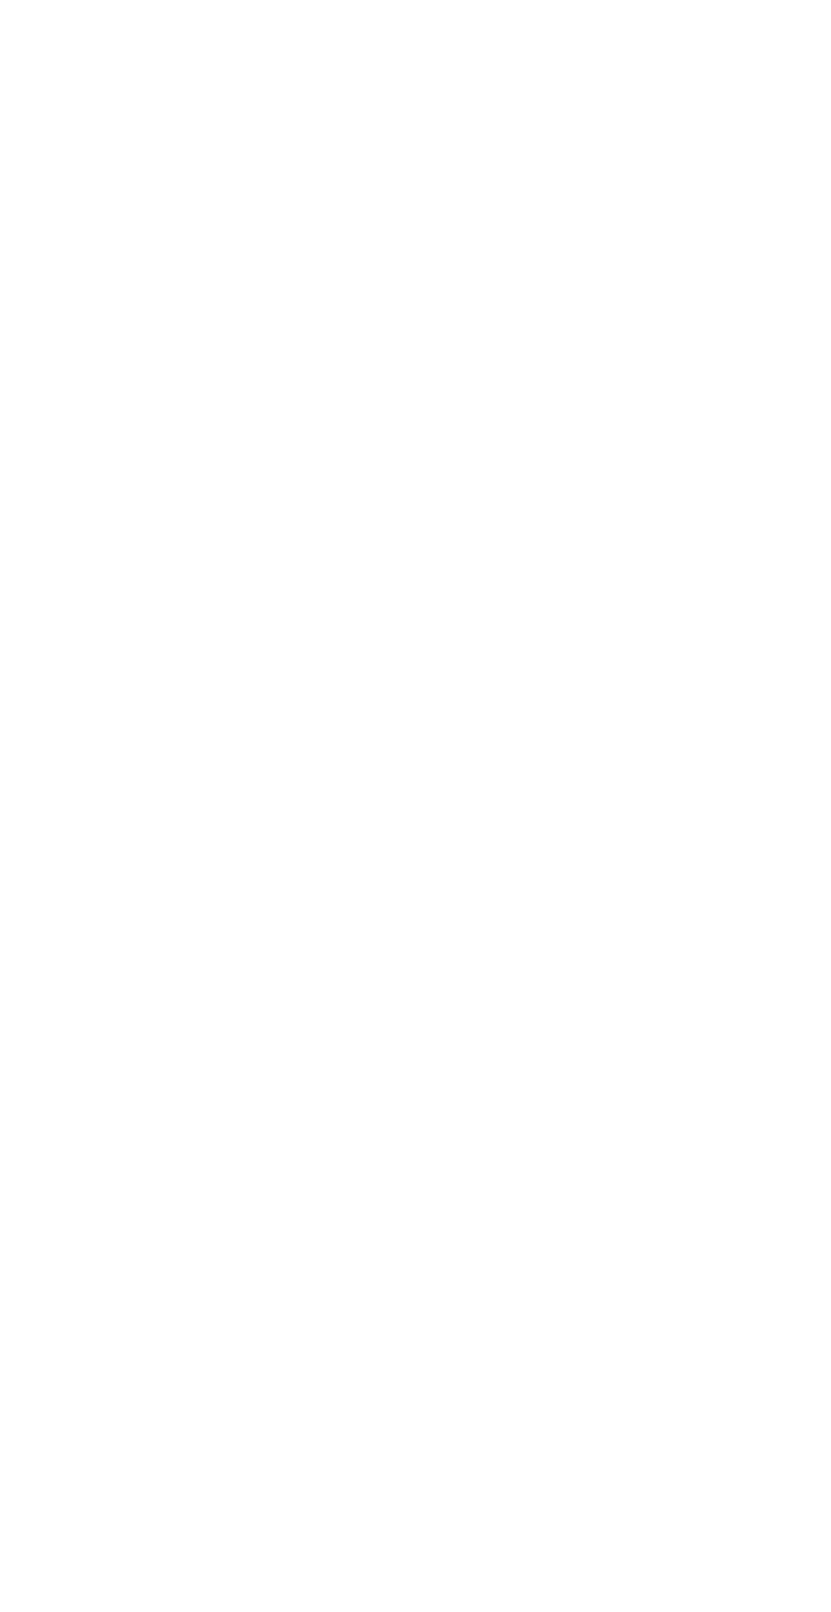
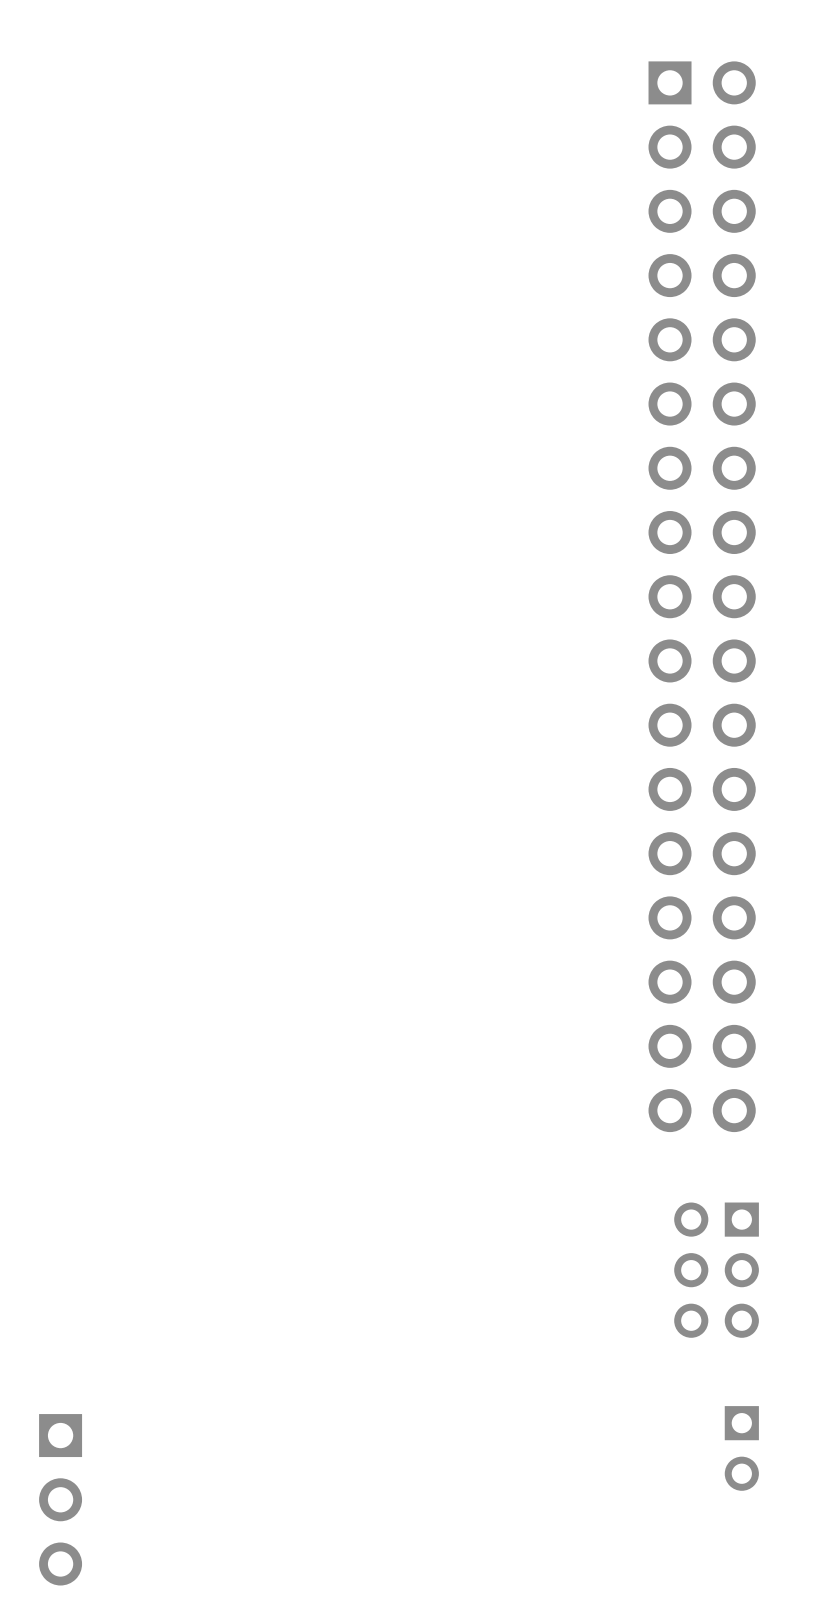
part: none -> (702, 596)
part: none -> (716, 1270)
part: none -> (741, 1448)
part: none -> (60, 1499)

